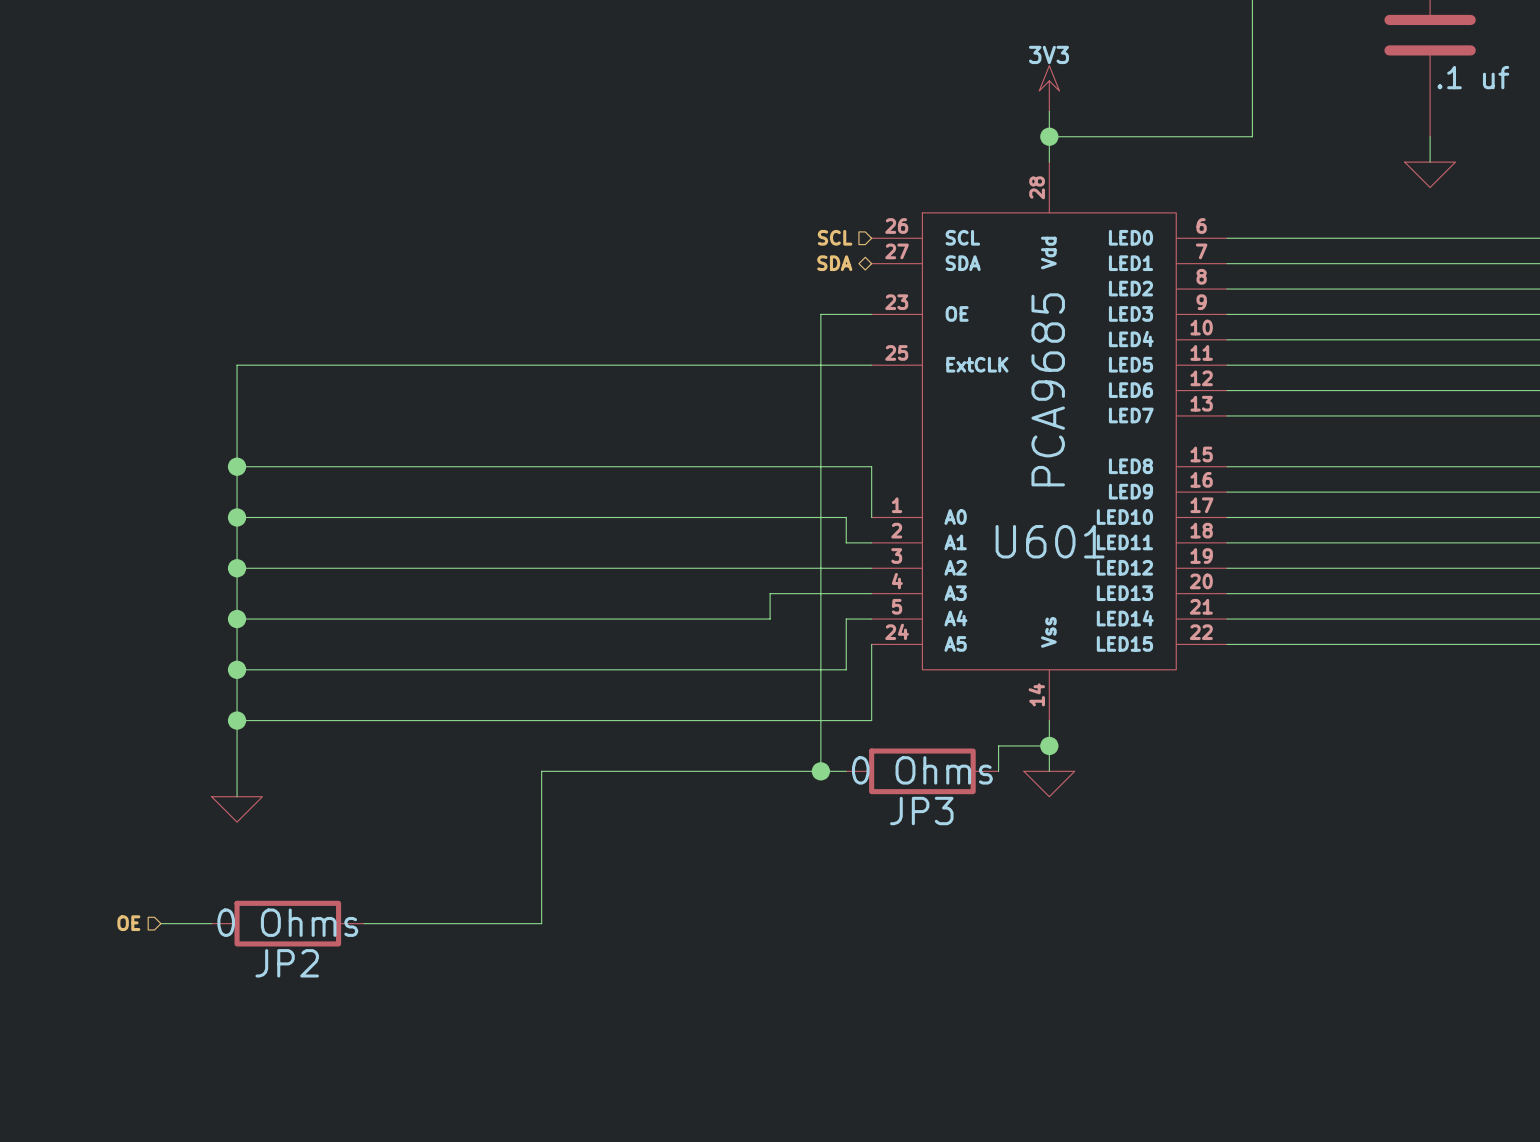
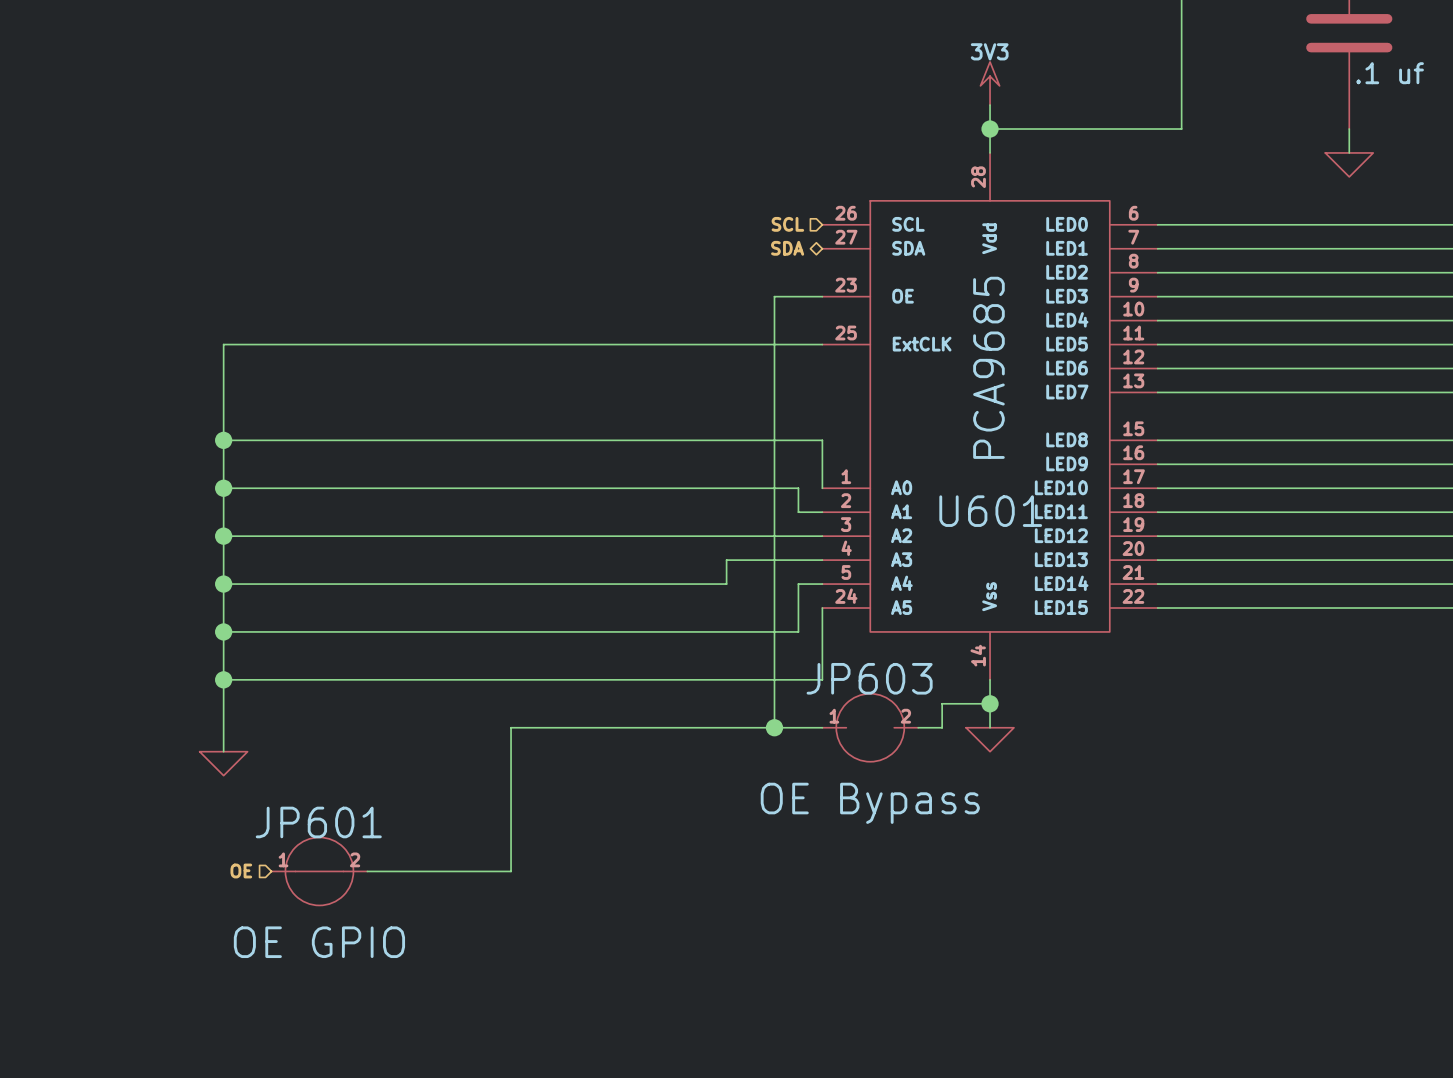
JP3: 0 Ohms (922, 771) -> none
JP603: none -> OE Bypass (870, 727)
hierarchical label position: OE (128, 923) -> OE (241, 871)
wire: (160, 923) (211, 923) -> none
JP2: 0 Ohms (287, 923) -> none
JP601: none -> OE GPIO (319, 871)

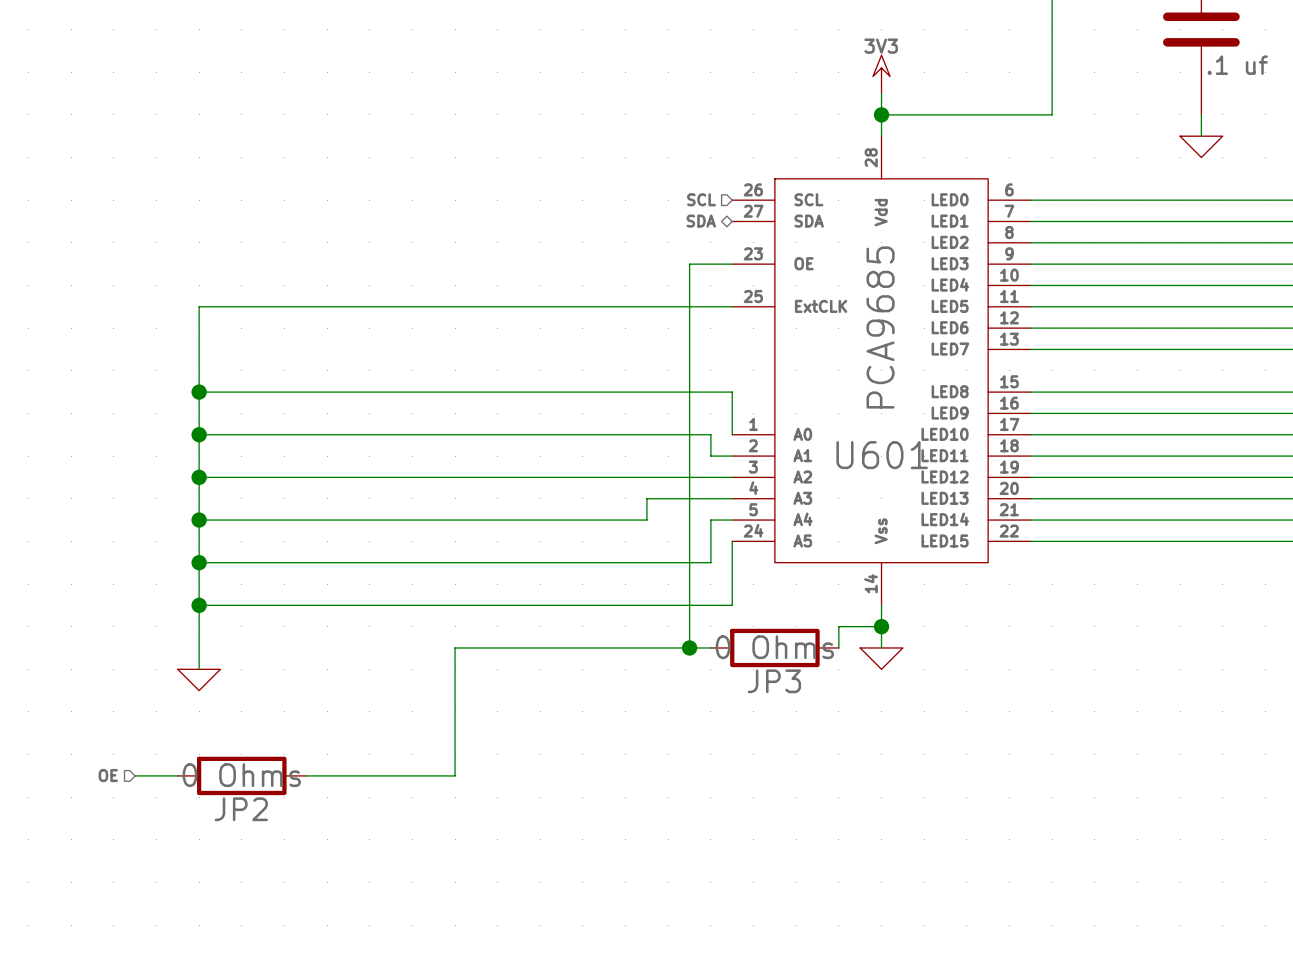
JP603: OE Bypass (870, 727) -> none
JP3: none -> 0 Ohms (774, 647)
wire: none -> (135, 775) (177, 775)
hierarchical label position: OE (241, 871) -> OE (108, 775)
JP2: none -> 0 Ohms (241, 775)
JP601: OE GPIO (319, 871) -> none

